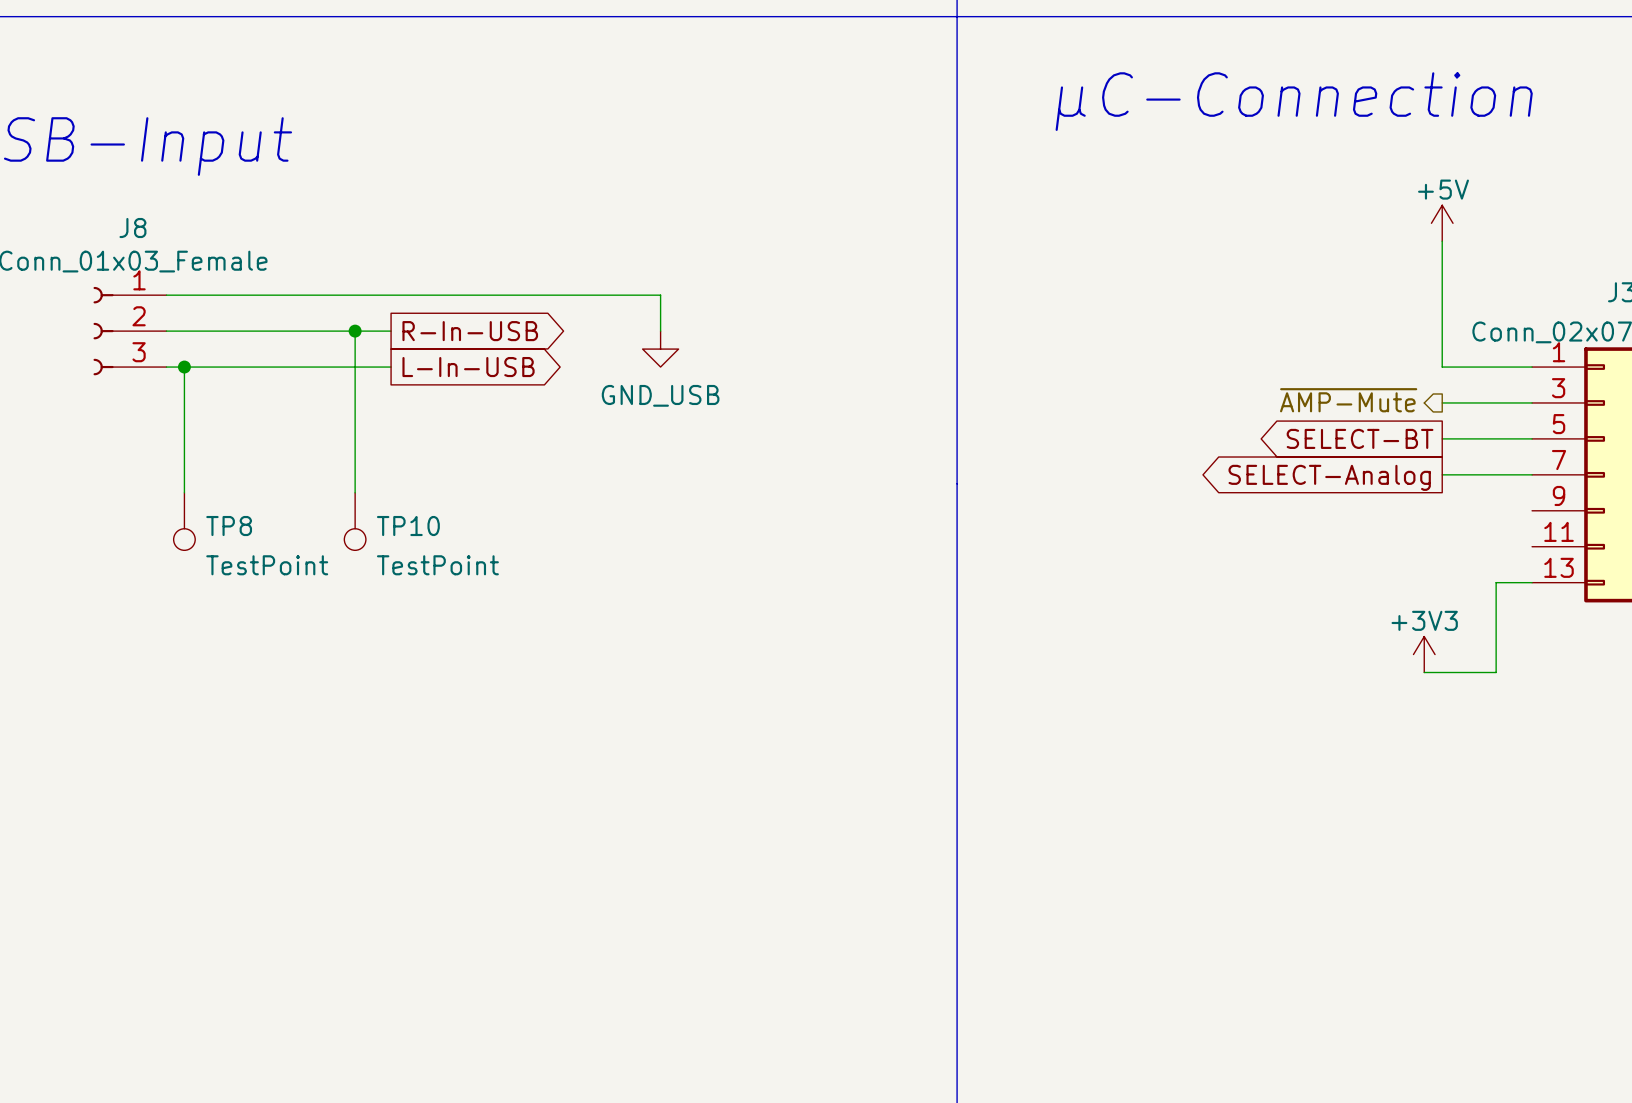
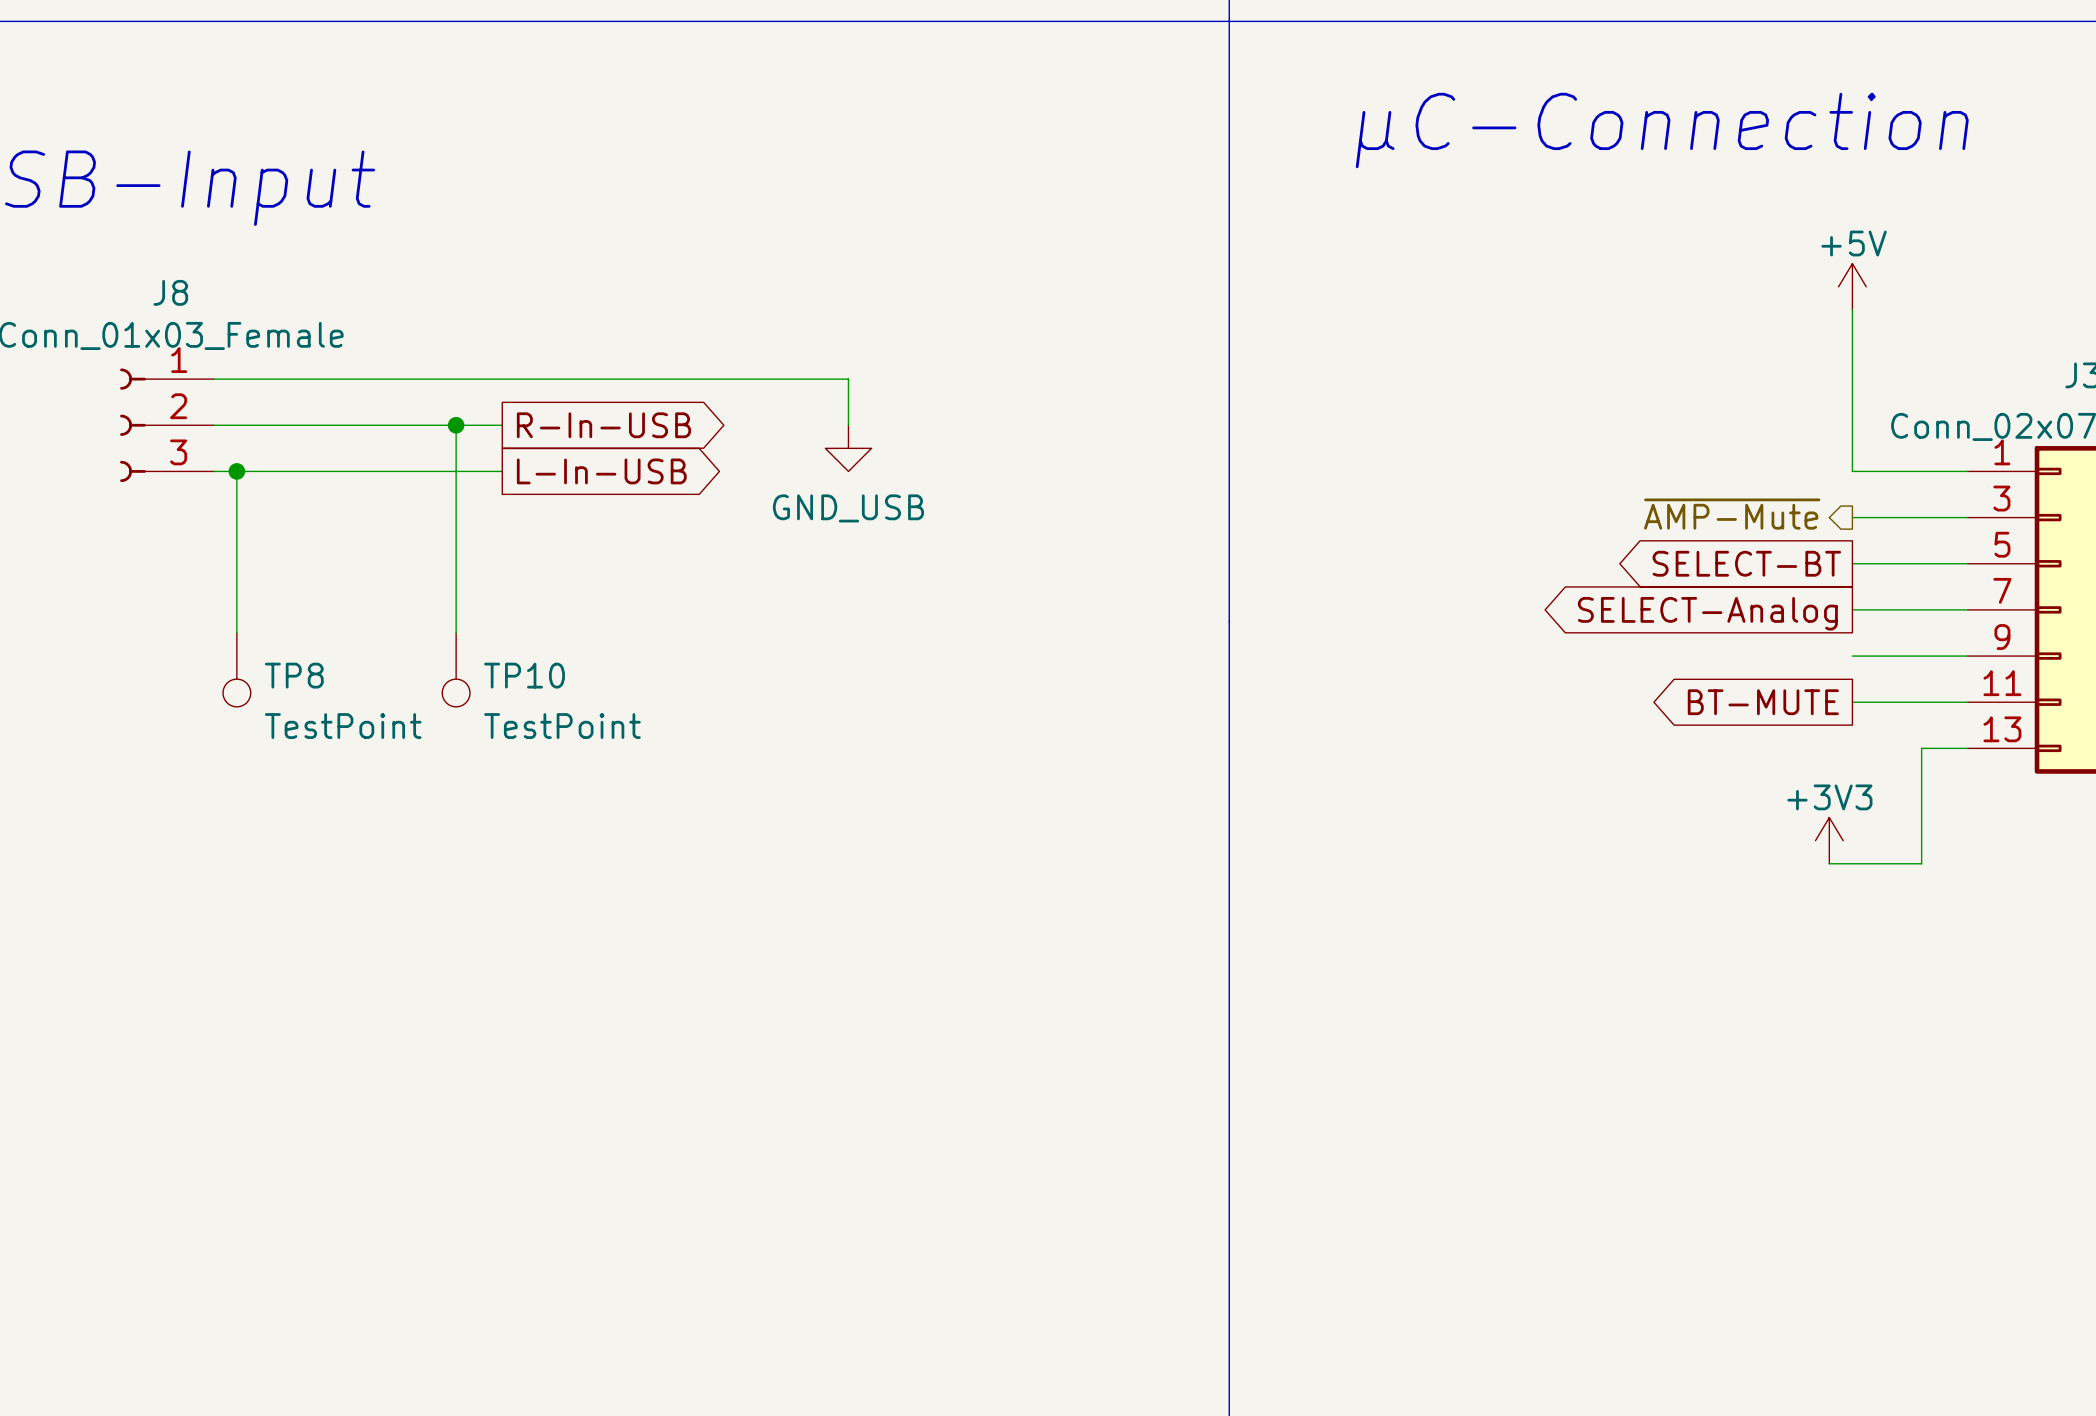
wire: none -> (1852, 656) (1967, 656)
global label: none -> BT-MUTE (1763, 702)
wire: none -> (1852, 702) (1967, 702)

